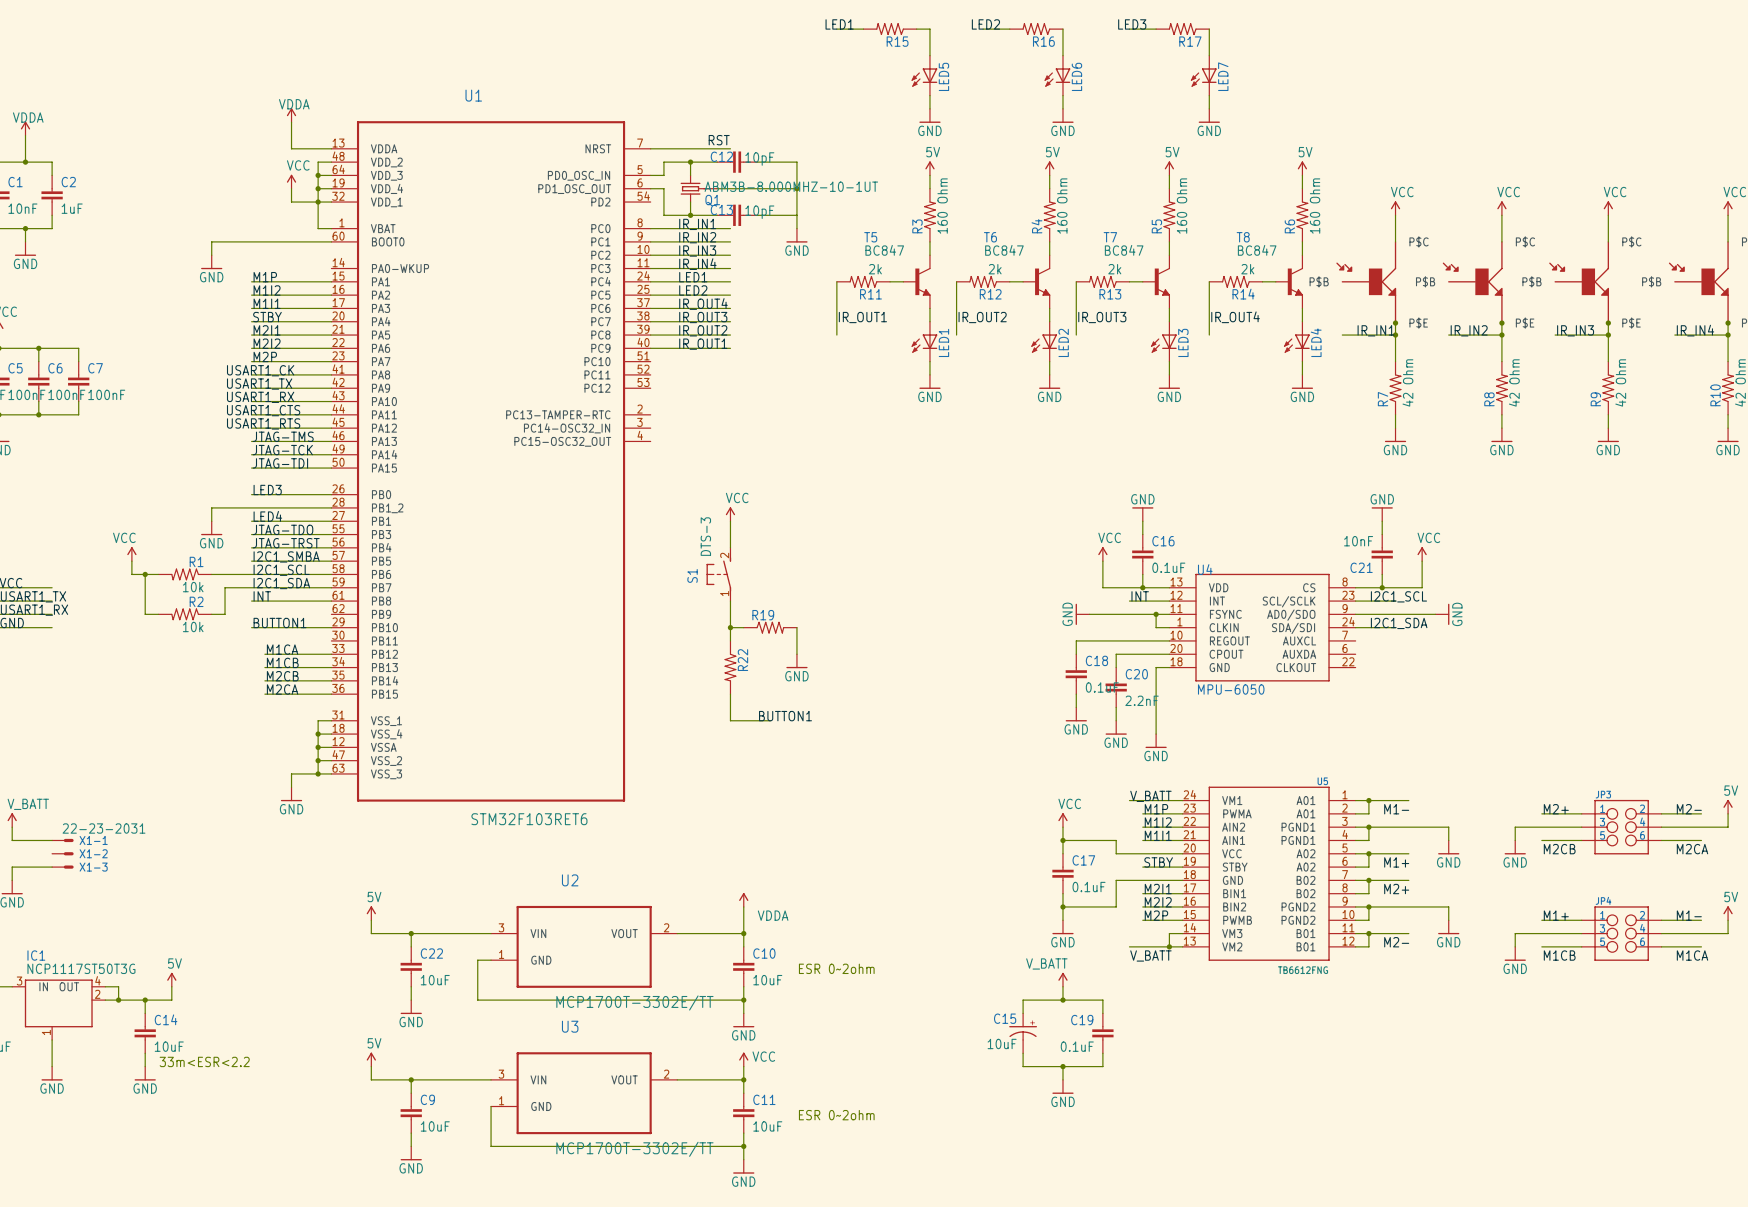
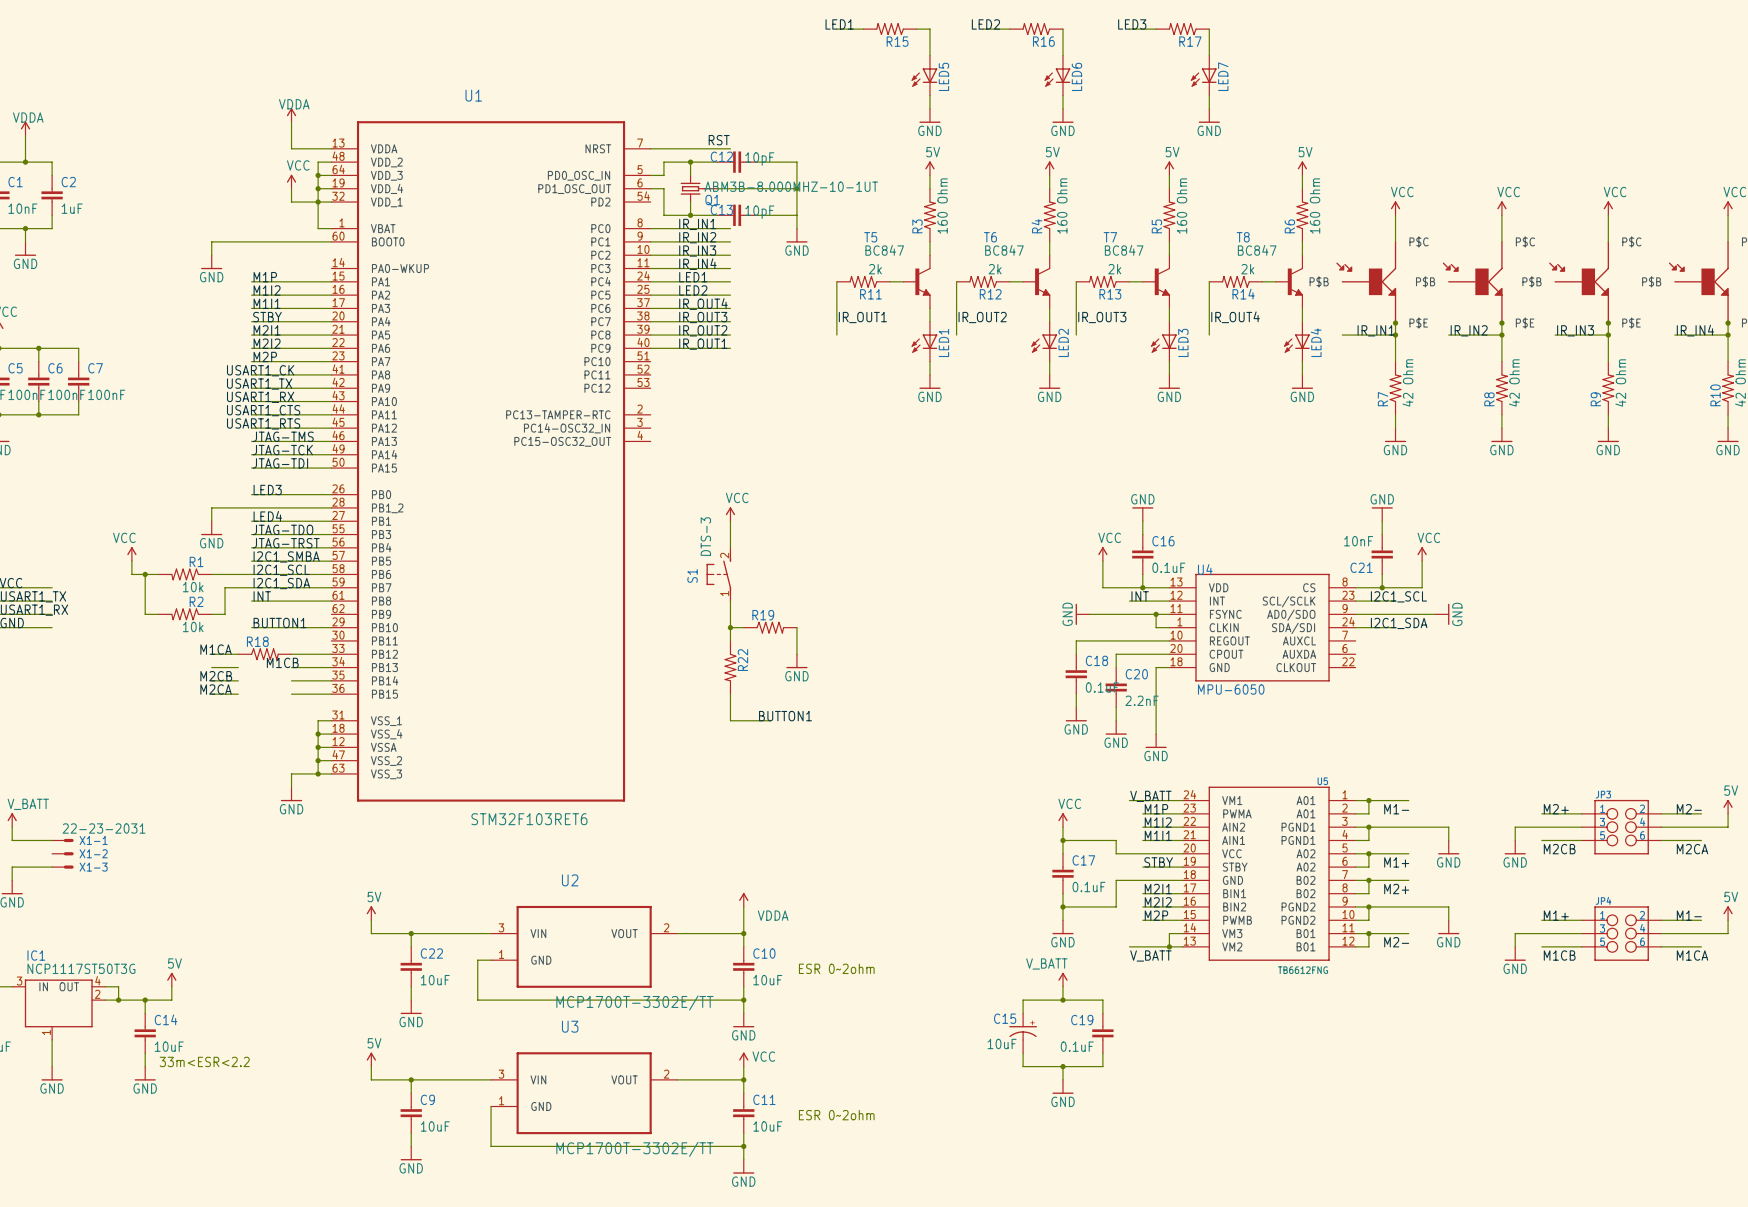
label position: M1CA (282, 649) -> M1CA (216, 649)
R18: none -> (264, 654)
wire: (264, 667) (291, 667) -> (211, 667) (238, 667)
label position: M2CB (282, 676) -> M2CB (216, 676)
wire: (264, 680) (291, 680) -> (211, 680) (238, 680)
label position: M2CA (282, 689) -> M2CA (216, 689)
wire: (264, 694) (291, 694) -> (211, 694) (238, 694)

